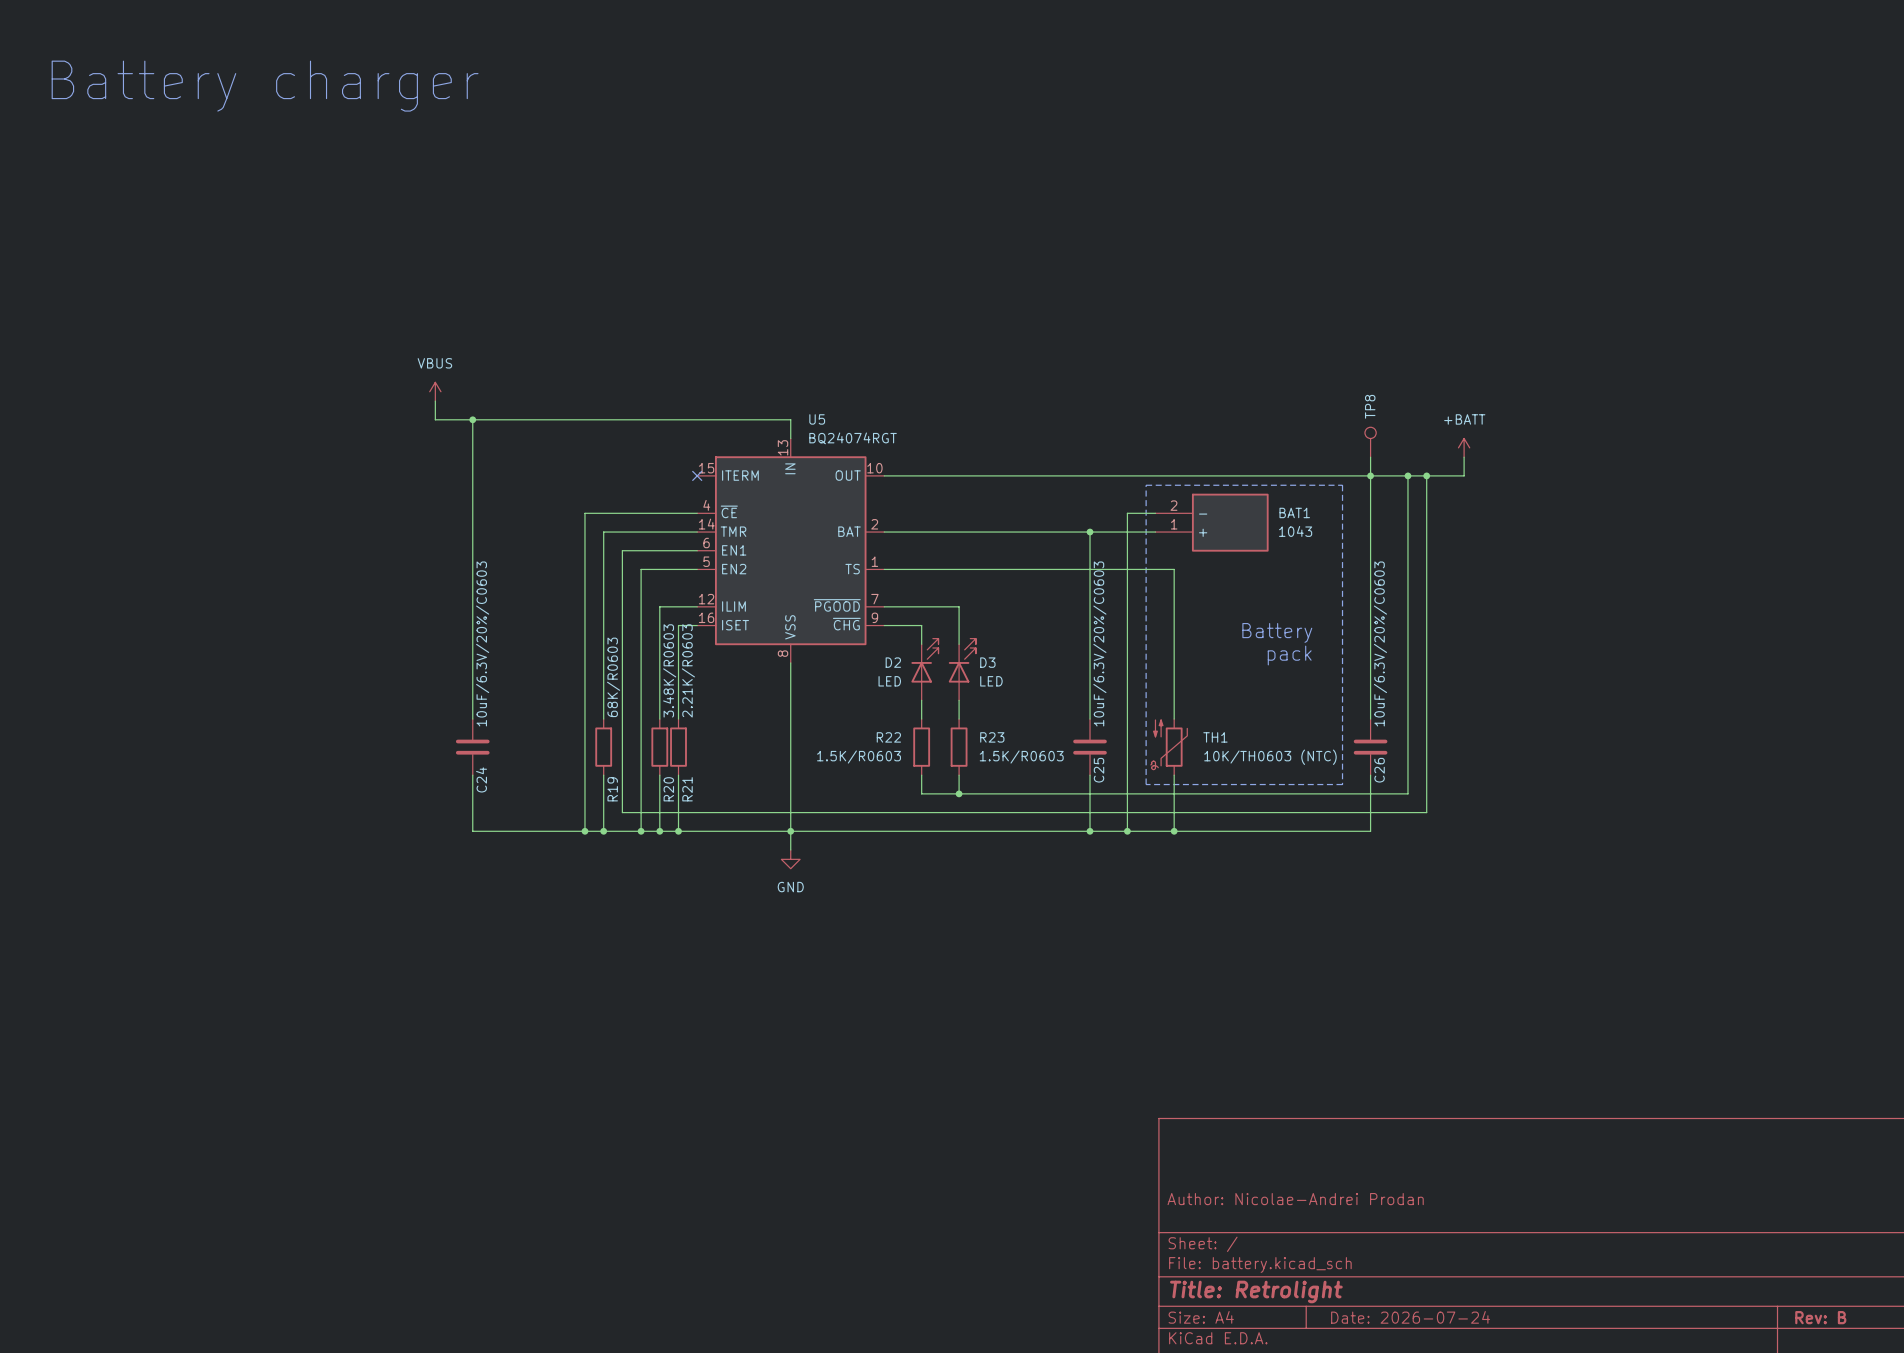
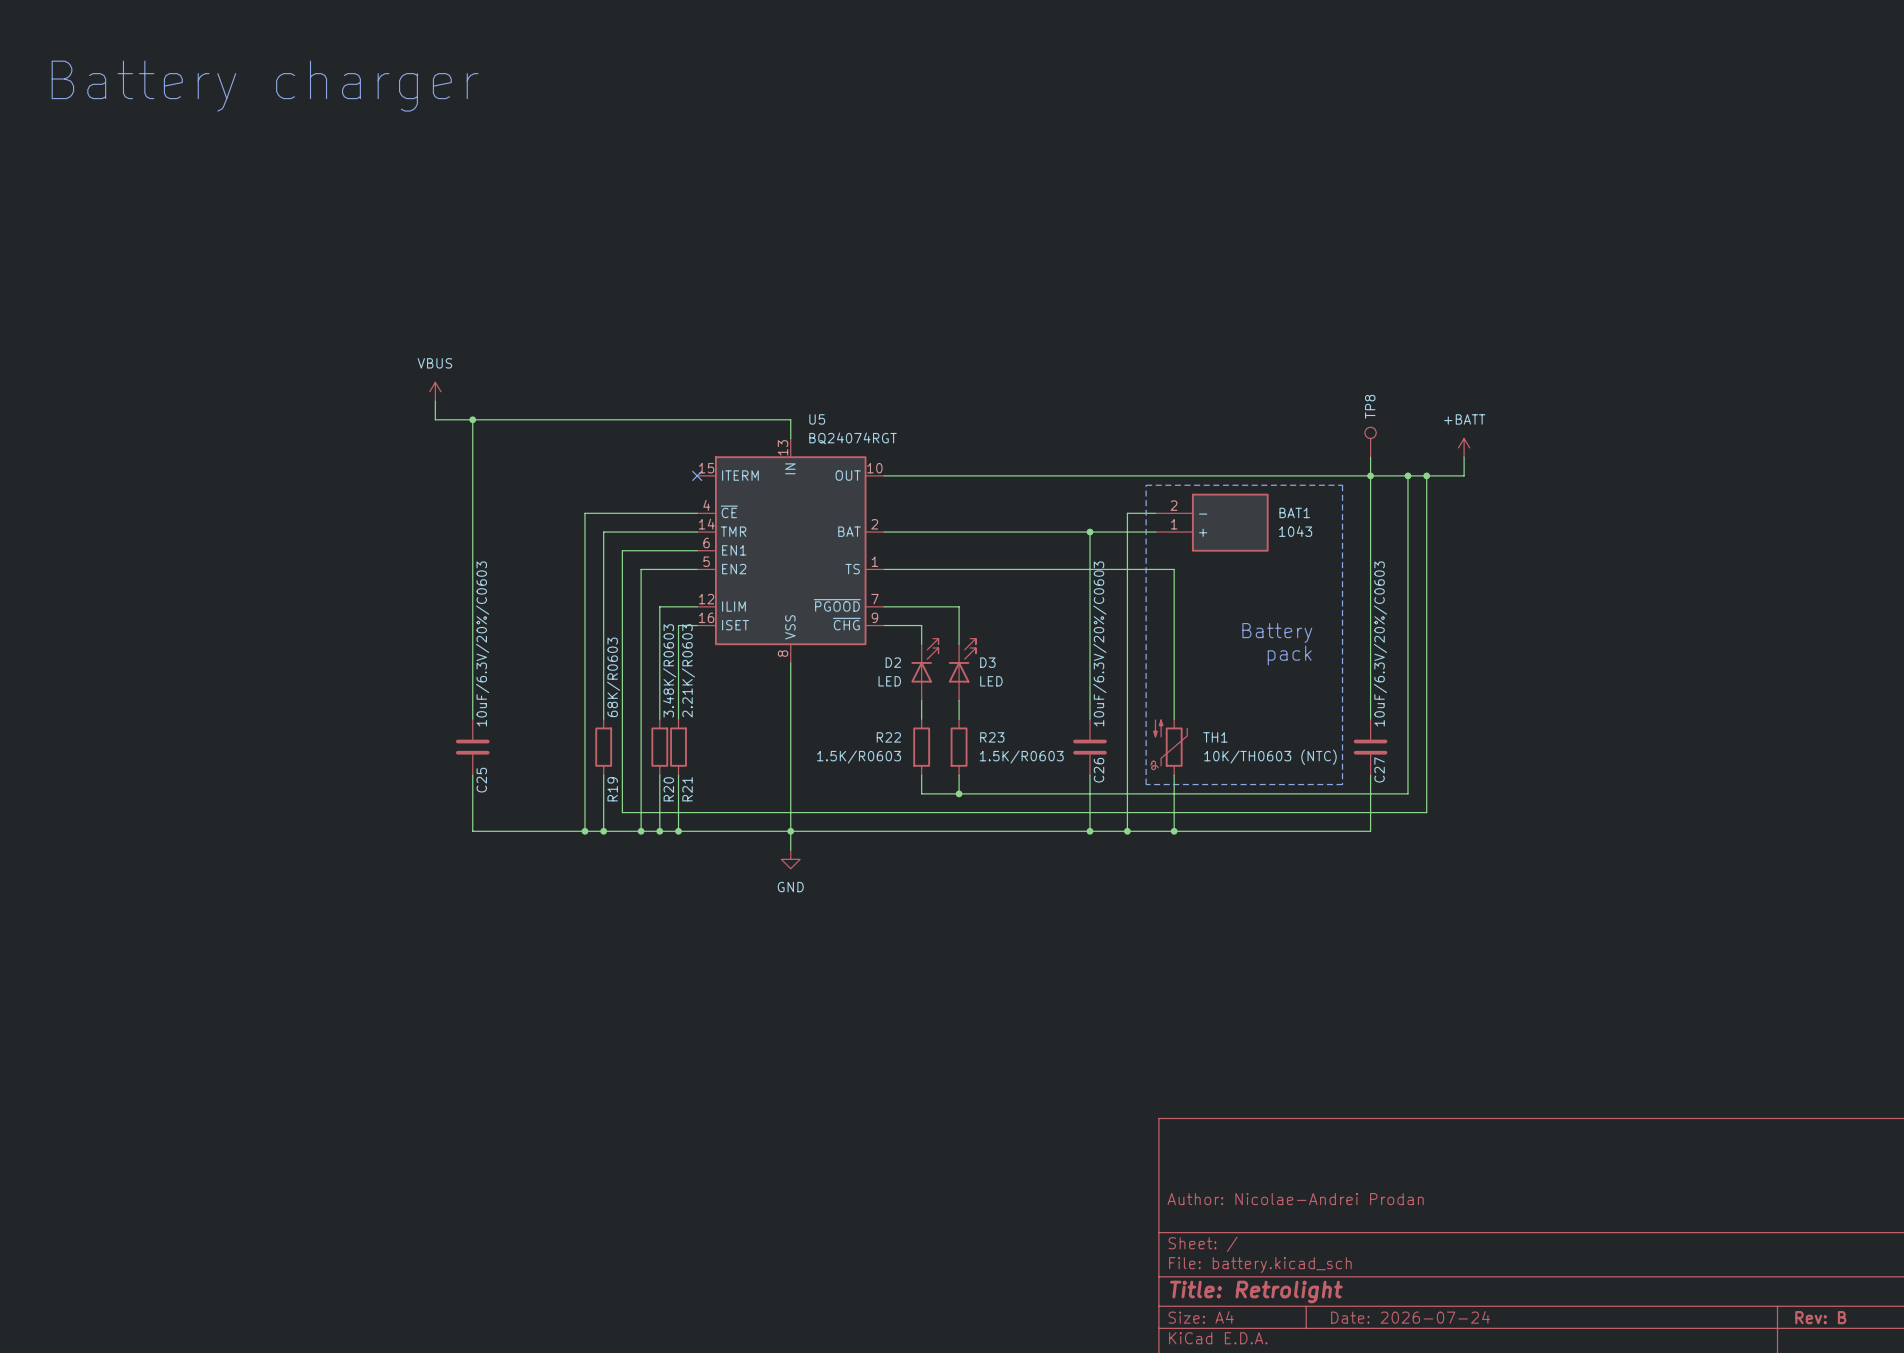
C25 name: C25 (1099, 770) -> C26 (1099, 770)
C26 name: C26 (1379, 770) -> C27 (1379, 769)
C24 name: C24 (481, 779) -> C25 (481, 780)

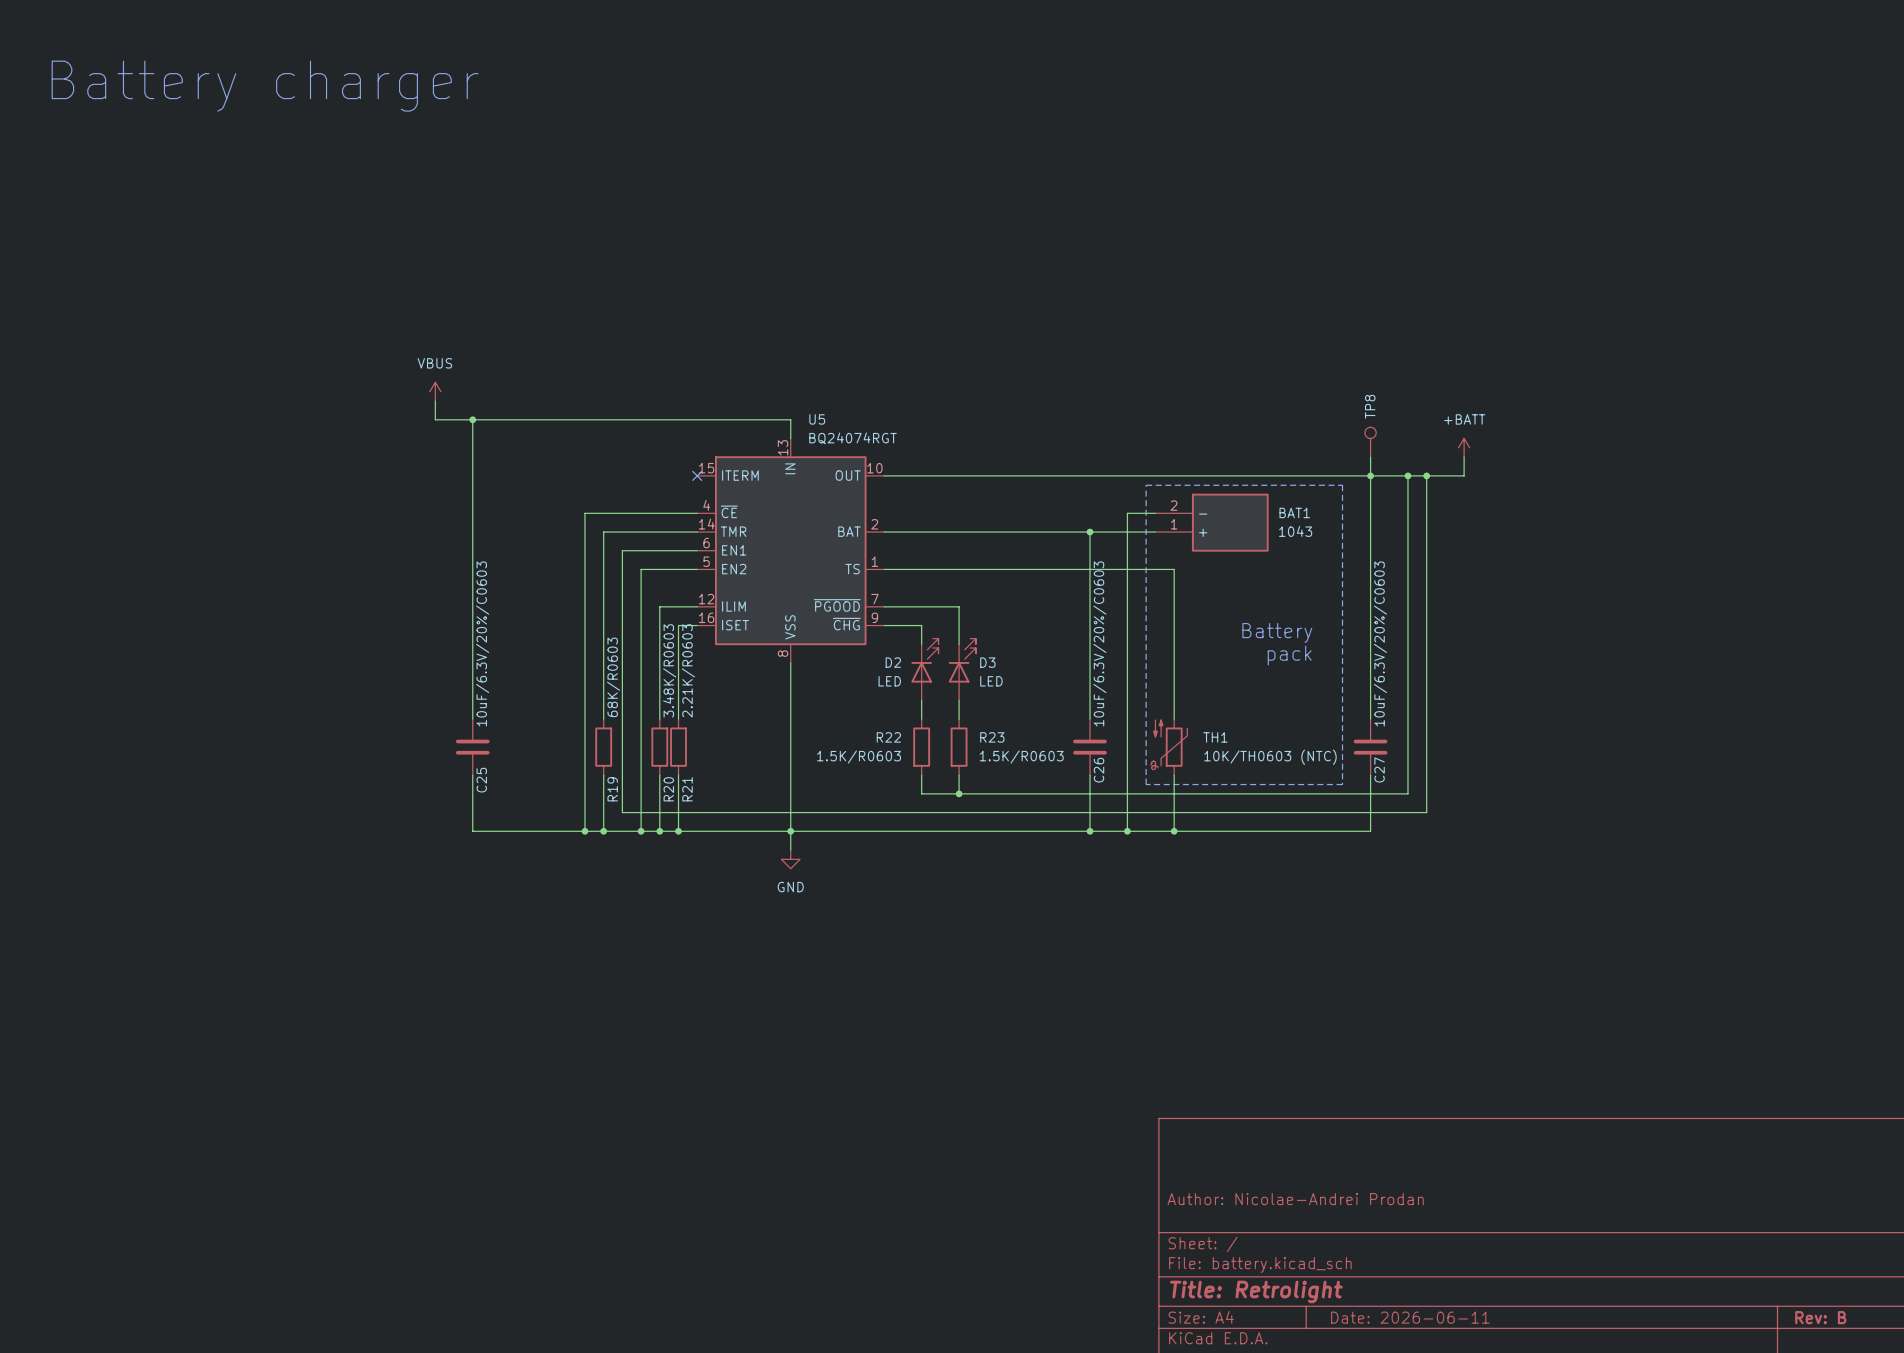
title block: Date: 2026-07-24 (1410, 1317) -> Date: 2026-06-11 (1410, 1317)

